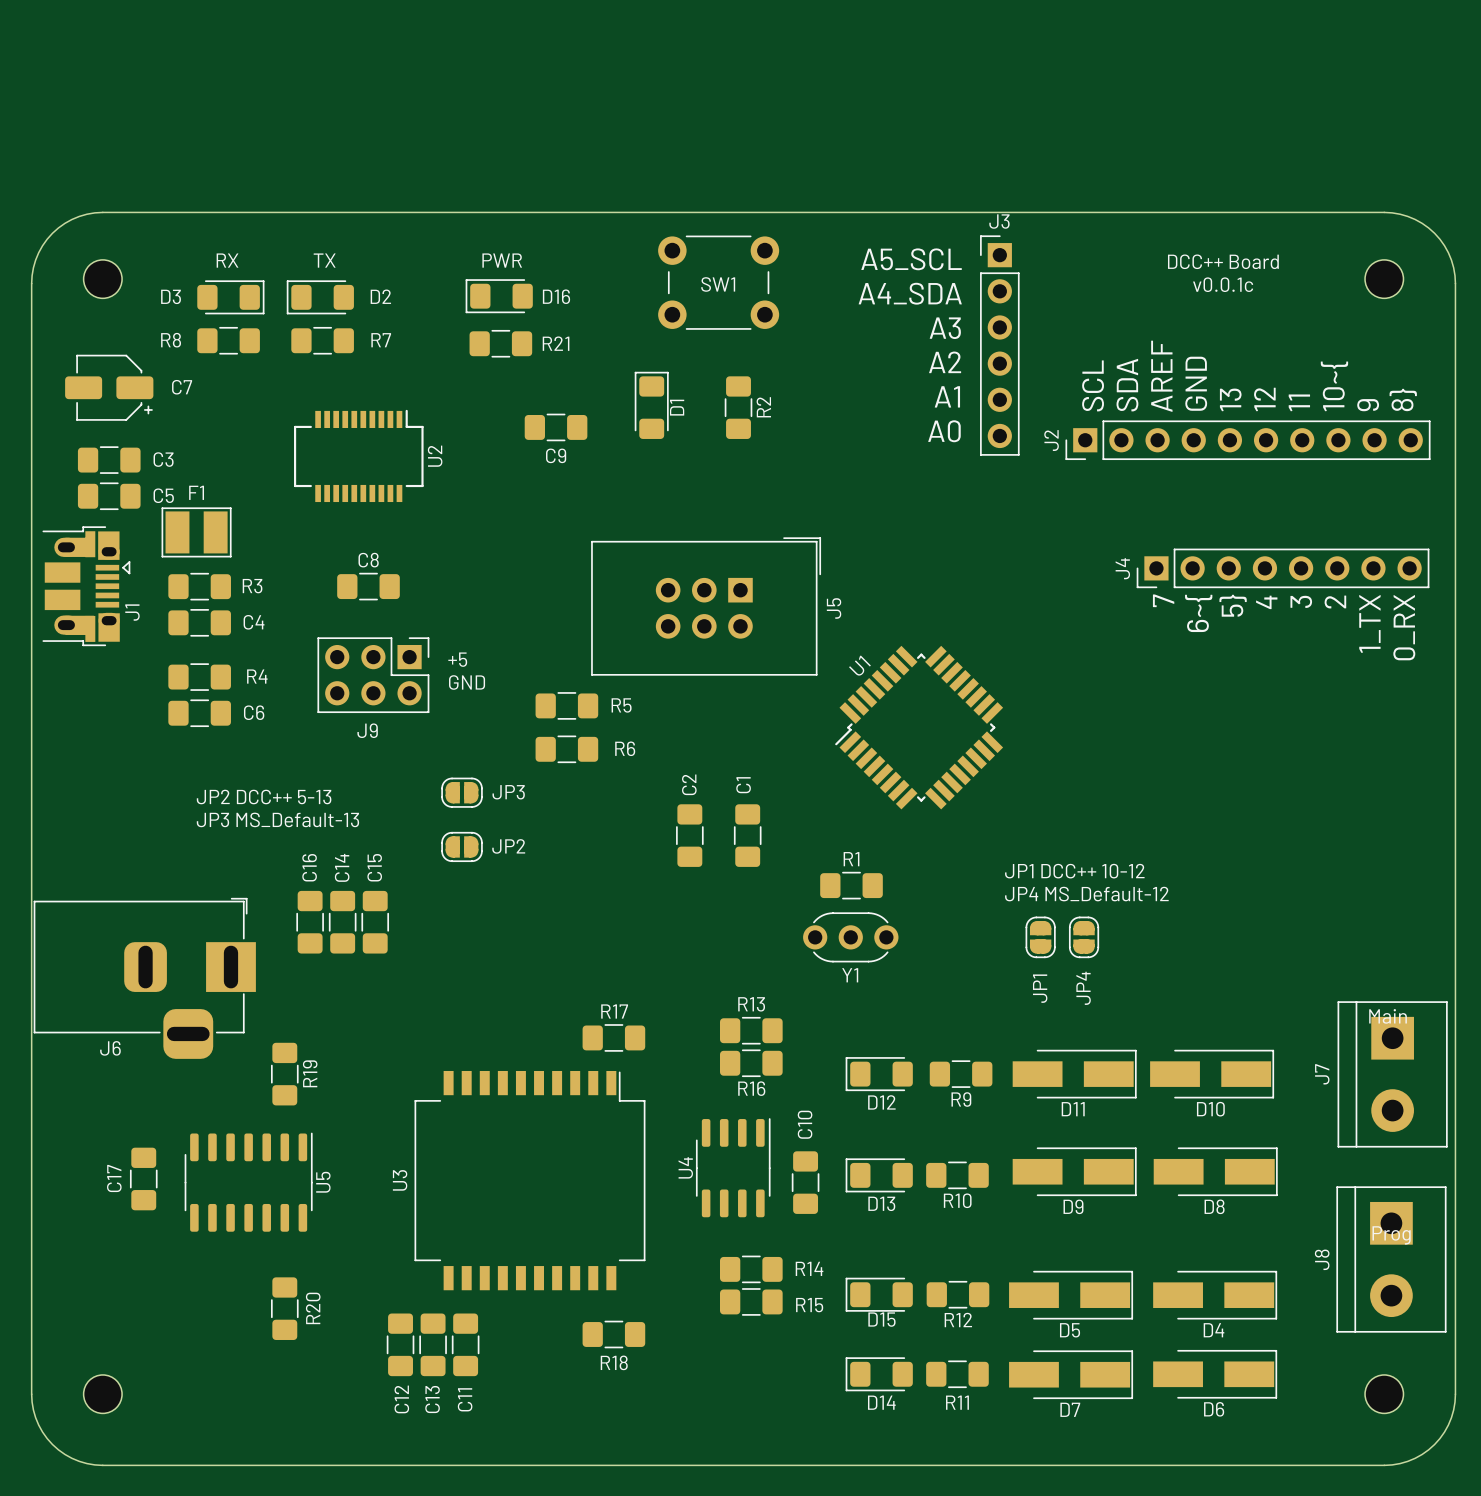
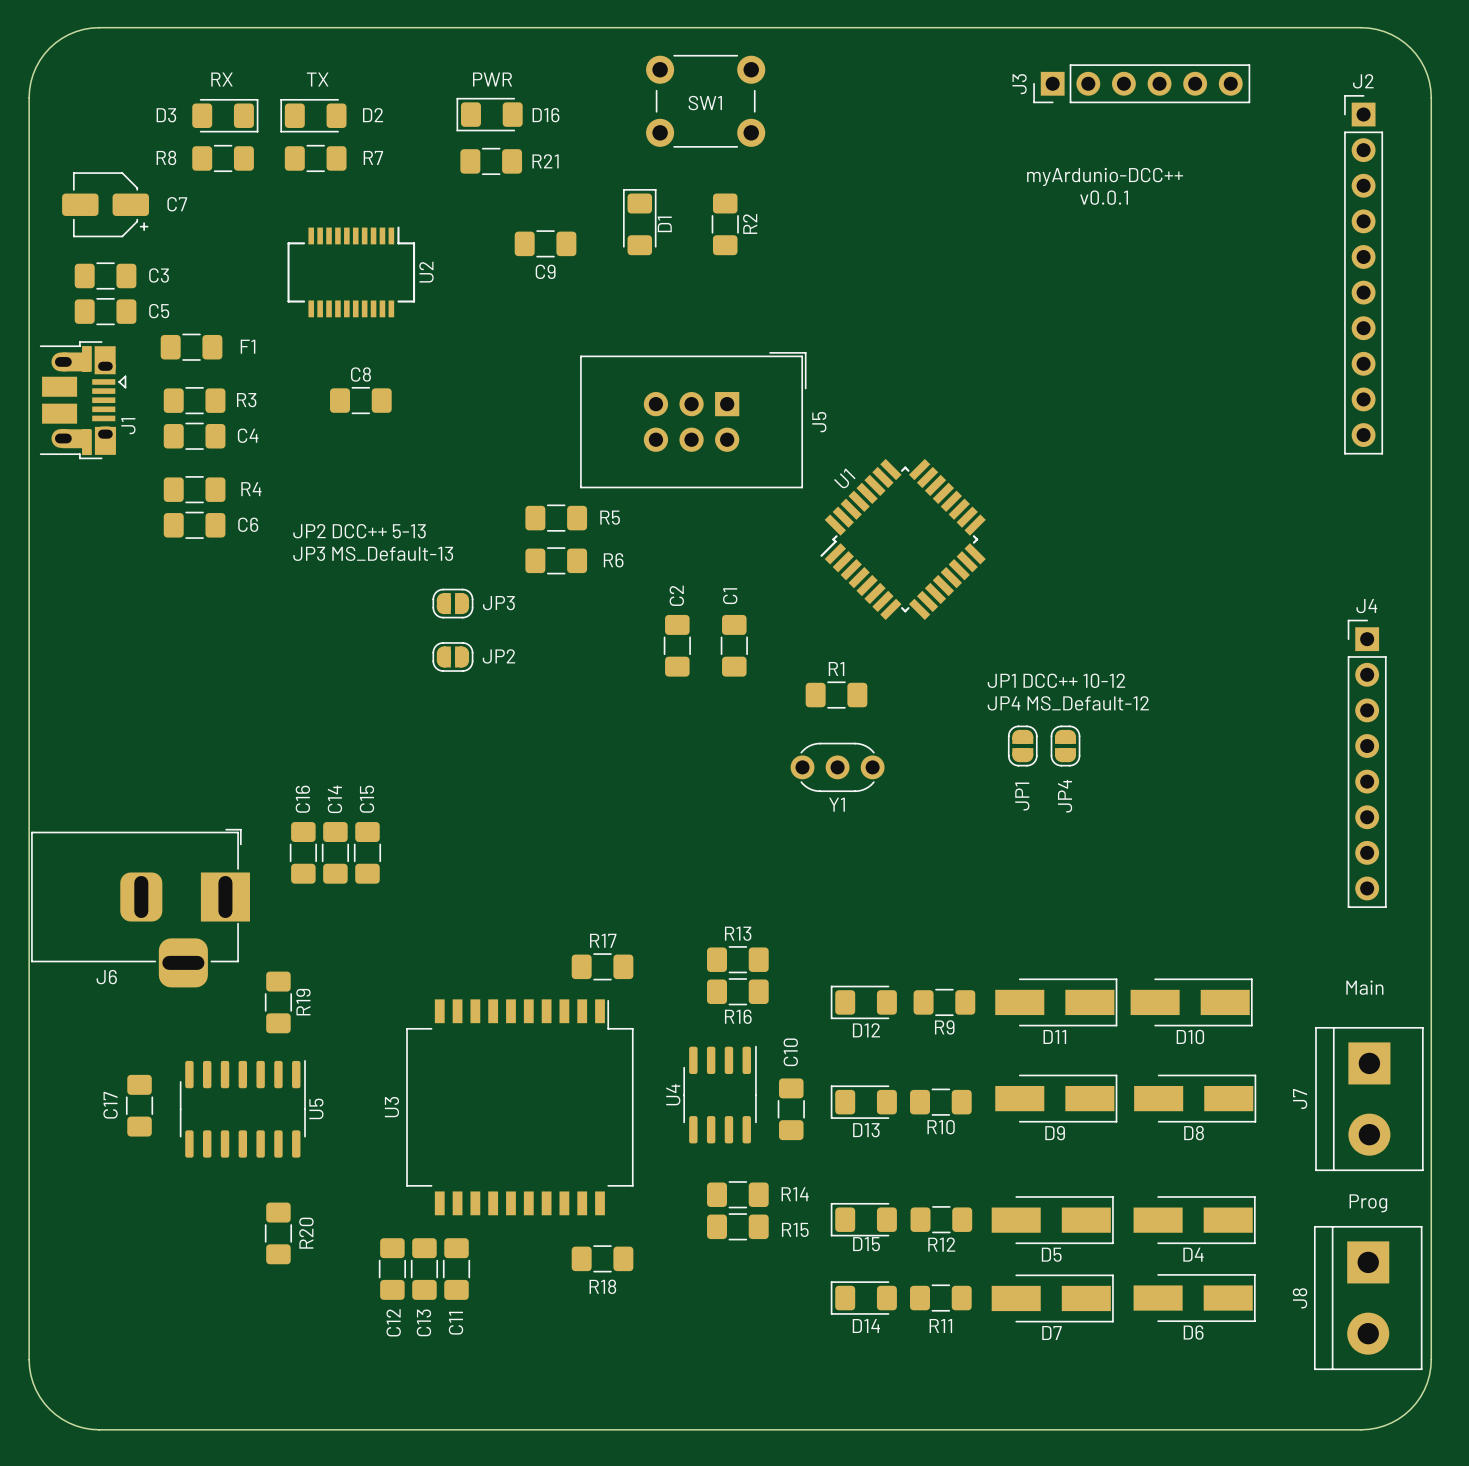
text: none -> myArdunio-DCC++ (1105, 176)
text: none -> v0.0.1 (1104, 197)
text: A5_SCL (911, 259) -> none
text position: RX (227, 260) -> RX (222, 79)
text position: TX (324, 260) -> TX (317, 79)
text position: PWR (502, 260) -> PWR (492, 79)
text: DCC++ Board (1223, 261) -> none
part: (102, 279) -> none
part: (1384, 279) -> none
SW1 position: (718, 282) -> (705, 101)
board edge: (31, 283) (33, 267) (38, 252) (52, 233) (71, 219) (87, 214) (102, 212) (1384, 212) (1407, 216) (1422, 223) (1434, 233) (1444, 245) (1451, 260) (1455, 283) -> (29, 266) (29, 97) (33, 74) (44, 54) (55, 42) (76, 31) (99, 27) (1361, 27) (1376, 29) (1398, 38) (1410, 48) (1424, 67) (1429, 82) (1431, 97) (1431, 266)
text: v0.0.1c (1223, 284) -> none
text: A4_SDA (910, 293) -> none
D16 position: (499, 296) -> (489, 114)
D3 position: (230, 297) -> (225, 115)
D2 position: (320, 297) -> (313, 115)
text: A3 (945, 328) -> none
R8 position: (228, 340) -> (223, 158)
R7 position: (322, 340) -> (315, 158)
R21 position: (500, 343) -> (491, 161)
J3 rotation: 0° (999, 345) -> 90° counterclockwise (1141, 83)
J3 position: (999, 345) -> (1141, 83)
text: A2 (945, 362) -> none
text: AREF (1161, 376) -> none
text: GND (1196, 383) -> none
text: SCL (1093, 385) -> none
text: SDA (1127, 385) -> none
text: 10~{ (1334, 386) -> none
C7 position: (109, 387) -> (105, 204)
text: A1 (947, 396) -> none
text: 13 (1230, 399) -> none
text: 12 (1264, 399) -> none
text: 8} (1403, 400) -> none
text: 11 (1299, 402) -> none
D1 position: (651, 405) -> (639, 222)
text: 9 (1368, 405) -> none
R2 position: (738, 407) -> (725, 224)
C9 position: (556, 427) -> (545, 243)
text: A0 (944, 431) -> none
J2 rotation: 0° (1248, 440) -> 90° clockwise (1363, 274)
U2 position: (358, 455) -> (351, 271)
C3 position: (109, 460) -> (105, 275)
F1 name position: F1 (196, 492) -> F1 (248, 346)
C5 position: (109, 496) -> (105, 311)
F1 footprint: [161, 507, 232, 558] -> [160, 333, 223, 361]
J4 rotation: 0° (1283, 568) -> 90° clockwise (1367, 763)
J4 position: (1283, 568) -> (1367, 763)
J1 position: (86, 586) -> (83, 400)
R3 position: (199, 586) -> (194, 400)
C8 position: (368, 586) -> (360, 400)
text: 7 (1163, 600) -> none
text: 3 (1301, 601) -> none
text: 4 (1266, 602) -> none
text: 2 (1335, 602) -> none
text: 5} (1233, 605) -> none
J5 position: (706, 606) -> (693, 420)
text: 6~{ (1198, 613) -> none
C4 position: (199, 622) -> (194, 436)
text: 1_TX (1369, 623) -> none
text: 0_RX (1404, 627) -> none
text: +5 (457, 659) -> none
J9: (373, 675) -> none
R4 position: (199, 677) -> (194, 489)
text: GND (467, 682) -> none
R5 position: (566, 705) -> (556, 518)
C6 position: (199, 713) -> (194, 525)
U1 position: (919, 727) -> (903, 539)
R6 position: (566, 749) -> (556, 560)
JP3 position: (462, 792) -> (452, 603)
text position: JP2 DCC++ 5-13 (264, 797) -> JP2 DCC++ 5-13 (359, 531)
text position: JP3 MS_Default-13 (277, 819) -> JP3 MS_Default-13 (373, 553)
C2 position: (689, 835) -> (677, 645)
C1 position: (747, 835) -> (734, 645)
JP2 position: (462, 846) -> (452, 656)
text position: JP1 DCC++ 10-12 (1074, 871) -> JP1 DCC++ 10-12 (1056, 680)
R1 position: (851, 885) -> (836, 695)
text position: JP4 MS_Default-12 (1086, 894) -> JP4 MS_Default-12 (1068, 703)
C16 position: (310, 922) -> (303, 852)
C14 position: (342, 922) -> (335, 852)
C15 position: (375, 922) -> (367, 852)
Y1 position: (850, 937) -> (837, 767)
JP1 position: (1040, 937) -> (1022, 746)
JP4 position: (1084, 937) -> (1065, 746)
J6 position: (144, 978) -> (140, 908)
R13 position: (751, 1030) -> (737, 959)
R17 position: (613, 1037) -> (602, 966)
R16 position: (751, 1063) -> (737, 991)
R19 position: (284, 1074) -> (278, 1002)
D12 position: (879, 1074) -> (863, 1002)
R9 position: (961, 1074) -> (944, 1002)
D11 position: (1074, 1074) -> (1056, 1002)
D10 position: (1212, 1074) -> (1191, 1002)
J7 position: (1392, 1074) -> (1369, 1099)
U4 position: (733, 1167) -> (720, 1094)
D9 position: (1074, 1171) -> (1056, 1098)
D8 position: (1215, 1171) -> (1195, 1098)
D13 position: (879, 1175) -> (863, 1102)
R10 position: (957, 1175) -> (940, 1102)
C17 position: (143, 1178) -> (139, 1105)
U3 position: (529, 1180) -> (519, 1107)
U5 position: (248, 1182) -> (242, 1108)
C10 position: (805, 1182) -> (791, 1109)
J8 position: (1391, 1259) -> (1368, 1298)
R15 position: (751, 1269) -> (737, 1194)
D15 position: (879, 1294) -> (863, 1219)
R12 position: (957, 1294) -> (941, 1219)
D5 position: (1071, 1295) -> (1052, 1220)
D4 position: (1215, 1295) -> (1194, 1220)
R14 position: (751, 1301) -> (737, 1226)
R20 position: (284, 1308) -> (278, 1233)
R18 position: (613, 1334) -> (602, 1258)
C12 position: (400, 1344) -> (392, 1269)
C13 position: (433, 1344) -> (424, 1269)
C11 position: (465, 1344) -> (456, 1269)
D14 position: (879, 1374) -> (863, 1298)
R11 position: (957, 1374) -> (940, 1298)
D7 position: (1071, 1374) -> (1052, 1298)
D6 position: (1215, 1374) -> (1194, 1298)
part: (102, 1394) -> none
part: (1384, 1394) -> none

